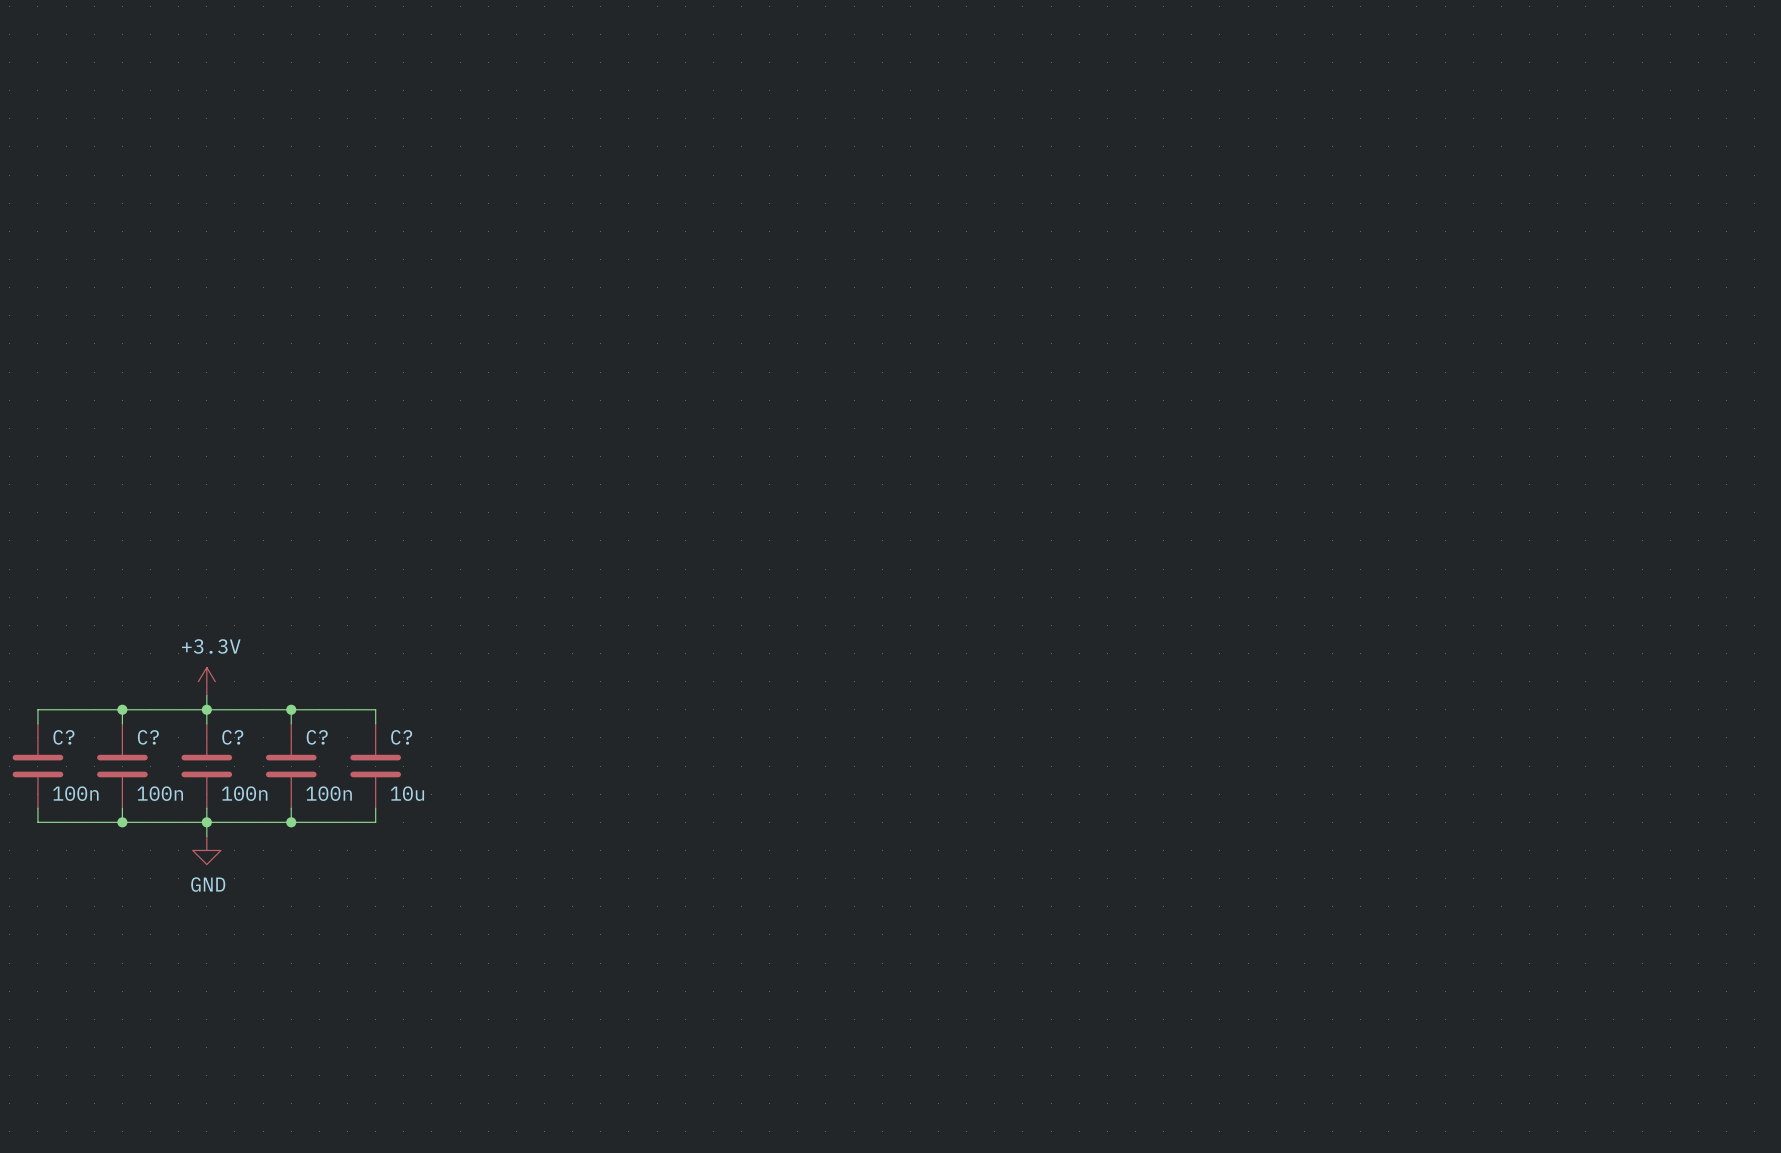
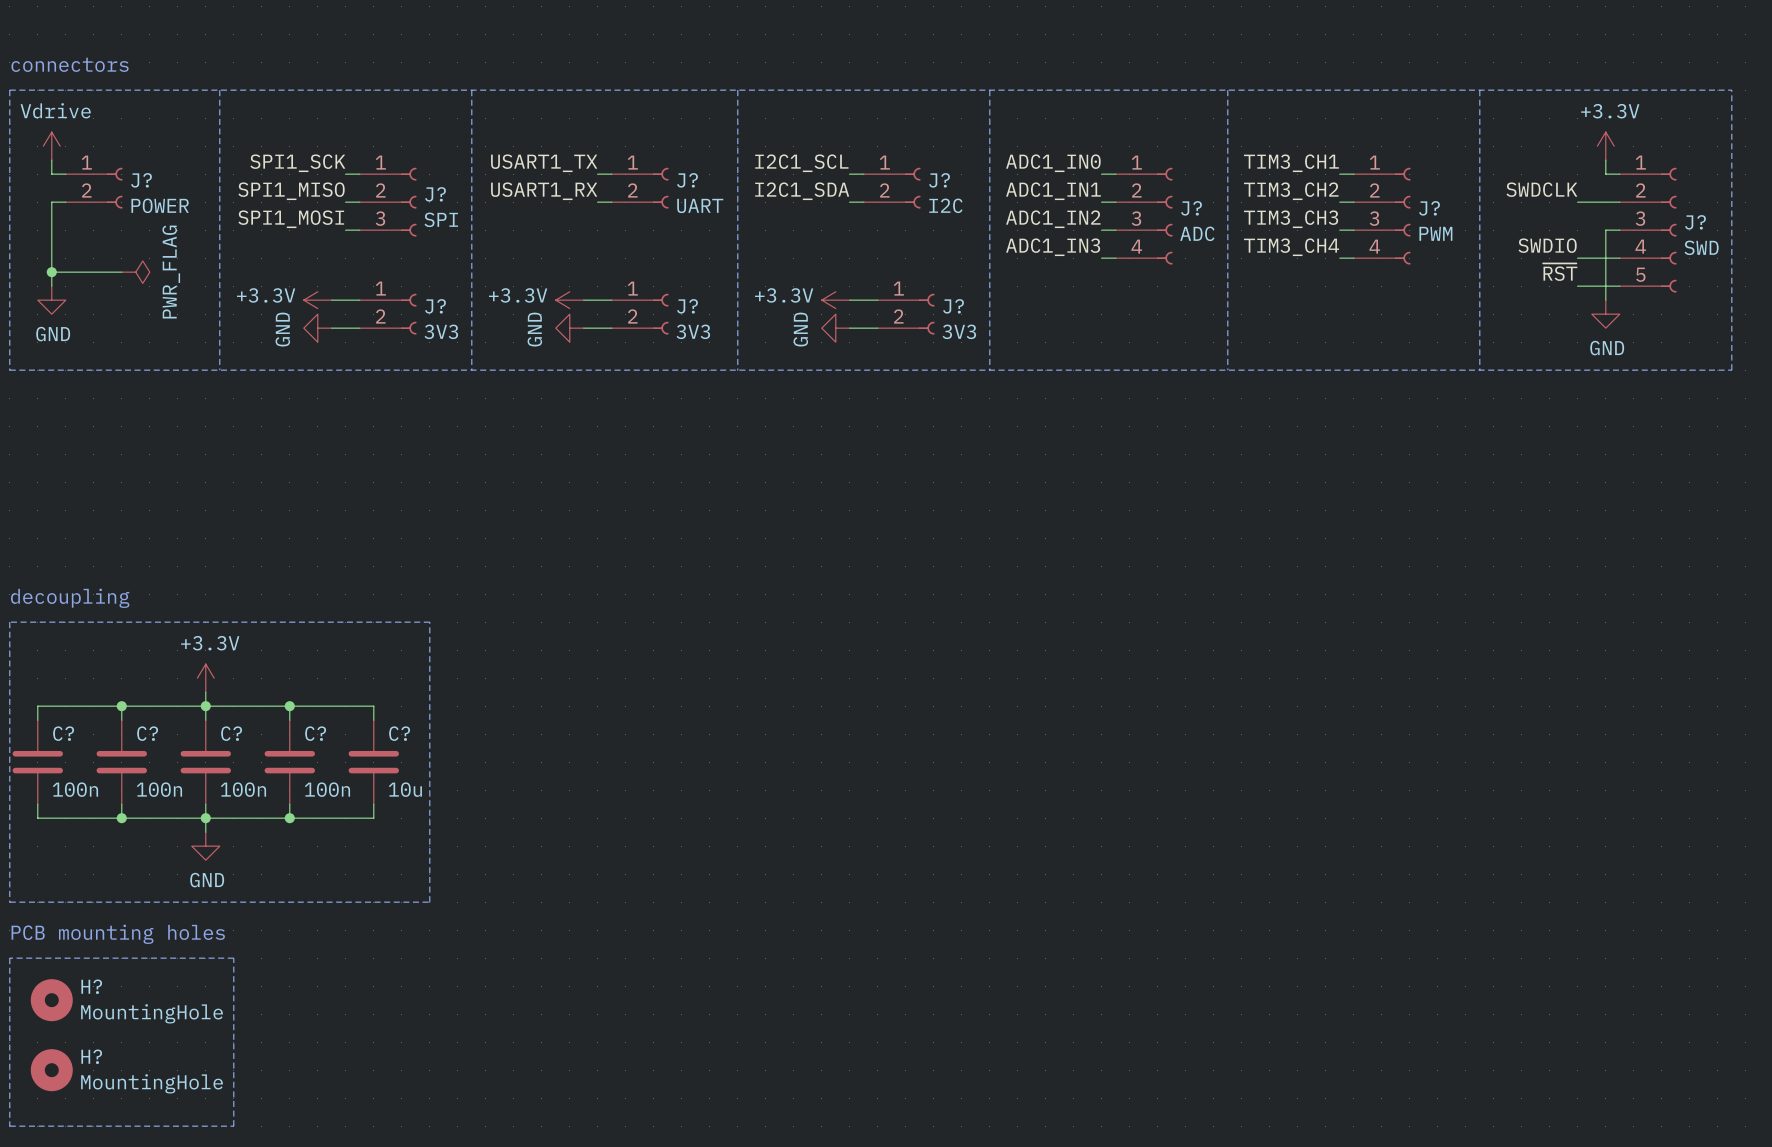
text: none -> connectors (70, 64)
line: none -> (9, 90) (9, 370) (1731, 370) (1731, 90) (9, 90)
line: none -> (219, 90) (219, 370)
line: none -> (471, 90) (471, 370)
line: none -> (737, 90) (737, 370)
line: none -> (989, 90) (989, 370)
line: none -> (1227, 90) (1227, 370)
line: none -> (1479, 90) (1479, 370)
power symbol: none -> Vdrive (51, 146)
power symbol: none -> +3.3V (1605, 146)
wire: none -> (51, 160) (51, 174) (65, 174)
wire: none -> (1605, 160) (1605, 174) (1619, 174)
label: none -> SPI1_SCK (297, 163)
label: none -> USART1_TX (544, 163)
label: none -> I2C1_SCL (801, 163)
label: none -> ADC1_IN0 (1053, 163)
label: none -> TIM3_CH1 (1291, 163)
wire: none -> (345, 174) (359, 174)
wire: none -> (597, 174) (611, 174)
wire: none -> (849, 174) (863, 174)
wire: none -> (1101, 174) (1115, 174)
wire: none -> (1339, 174) (1353, 174)
J?: none -> POWER (94, 188)
J?: none -> UART (640, 188)
J?: none -> I2C (892, 188)
label: none -> SWDCLK (1541, 189)
label: none -> SPI1_MISO (291, 191)
label: none -> USART1_RX (544, 191)
label: none -> I2C1_SDA (802, 191)
label: none -> ADC1_IN1 (1053, 191)
label: none -> TIM3_CH2 (1291, 191)
wire: none -> (65, 202) (51, 202) (51, 286)
wire: none -> (345, 202) (359, 202)
J?: none -> SPI (388, 202)
wire: none -> (597, 202) (611, 202)
wire: none -> (849, 202) (863, 202)
wire: none -> (1101, 202) (1115, 202)
wire: none -> (1339, 202) (1353, 202)
wire: none -> (1577, 202) (1619, 202)
J?: none -> ADC (1144, 216)
J?: none -> PWM (1382, 216)
label: none -> SPI1_MOSI (291, 219)
label: none -> ADC1_IN2 (1053, 219)
label: none -> TIM3_CH3 (1291, 219)
wire: none -> (345, 230) (359, 230)
wire: none -> (1101, 230) (1115, 230)
wire: none -> (1339, 230) (1353, 230)
wire: none -> (1619, 230) (1605, 230) (1605, 300)
J?: none -> SWD (1648, 230)
label: none -> SWDIO (1547, 245)
label: none -> ADC1_IN3 (1053, 247)
label: none -> TIM3_CH4 (1291, 247)
wire: none -> (1101, 258) (1115, 258)
wire: none -> (1339, 258) (1353, 258)
wire: none -> (1577, 258) (1619, 258)
wire: none -> (51, 272) (121, 272)
junction: none -> (51, 272)
power symbol: none -> PWR_FLAG (135, 272)
label: none -> ~{RST} (1560, 272)
wire: none -> (1577, 286) (1619, 286)
power symbol: none -> GND (51, 300)
power symbol: none -> +3.3V (317, 300)
wire: none -> (331, 300) (359, 300)
power symbol: none -> +3.3V (569, 300)
wire: none -> (583, 300) (611, 300)
power symbol: none -> +3.3V (835, 300)
wire: none -> (849, 300) (877, 300)
J?: none -> 3V3 (388, 314)
J?: none -> 3V3 (640, 314)
J?: none -> 3V3 (906, 314)
power symbol: none -> GND (1605, 314)
power symbol: none -> GND (317, 328)
wire: none -> (331, 328) (359, 328)
power symbol: none -> GND (569, 328)
wire: none -> (583, 328) (611, 328)
power symbol: none -> GND (835, 328)
wire: none -> (849, 328) (877, 328)
text: none -> decoupling (70, 598)
line: none -> (9, 622) (9, 902) (429, 902) (429, 622) (9, 622)
text: none -> PCB mounting holes (118, 934)
line: none -> (9, 958) (9, 1126) (233, 1126) (233, 958) (9, 958)
H?: none -> MountingHole (51, 1000)
H?: none -> MountingHole (51, 1070)

